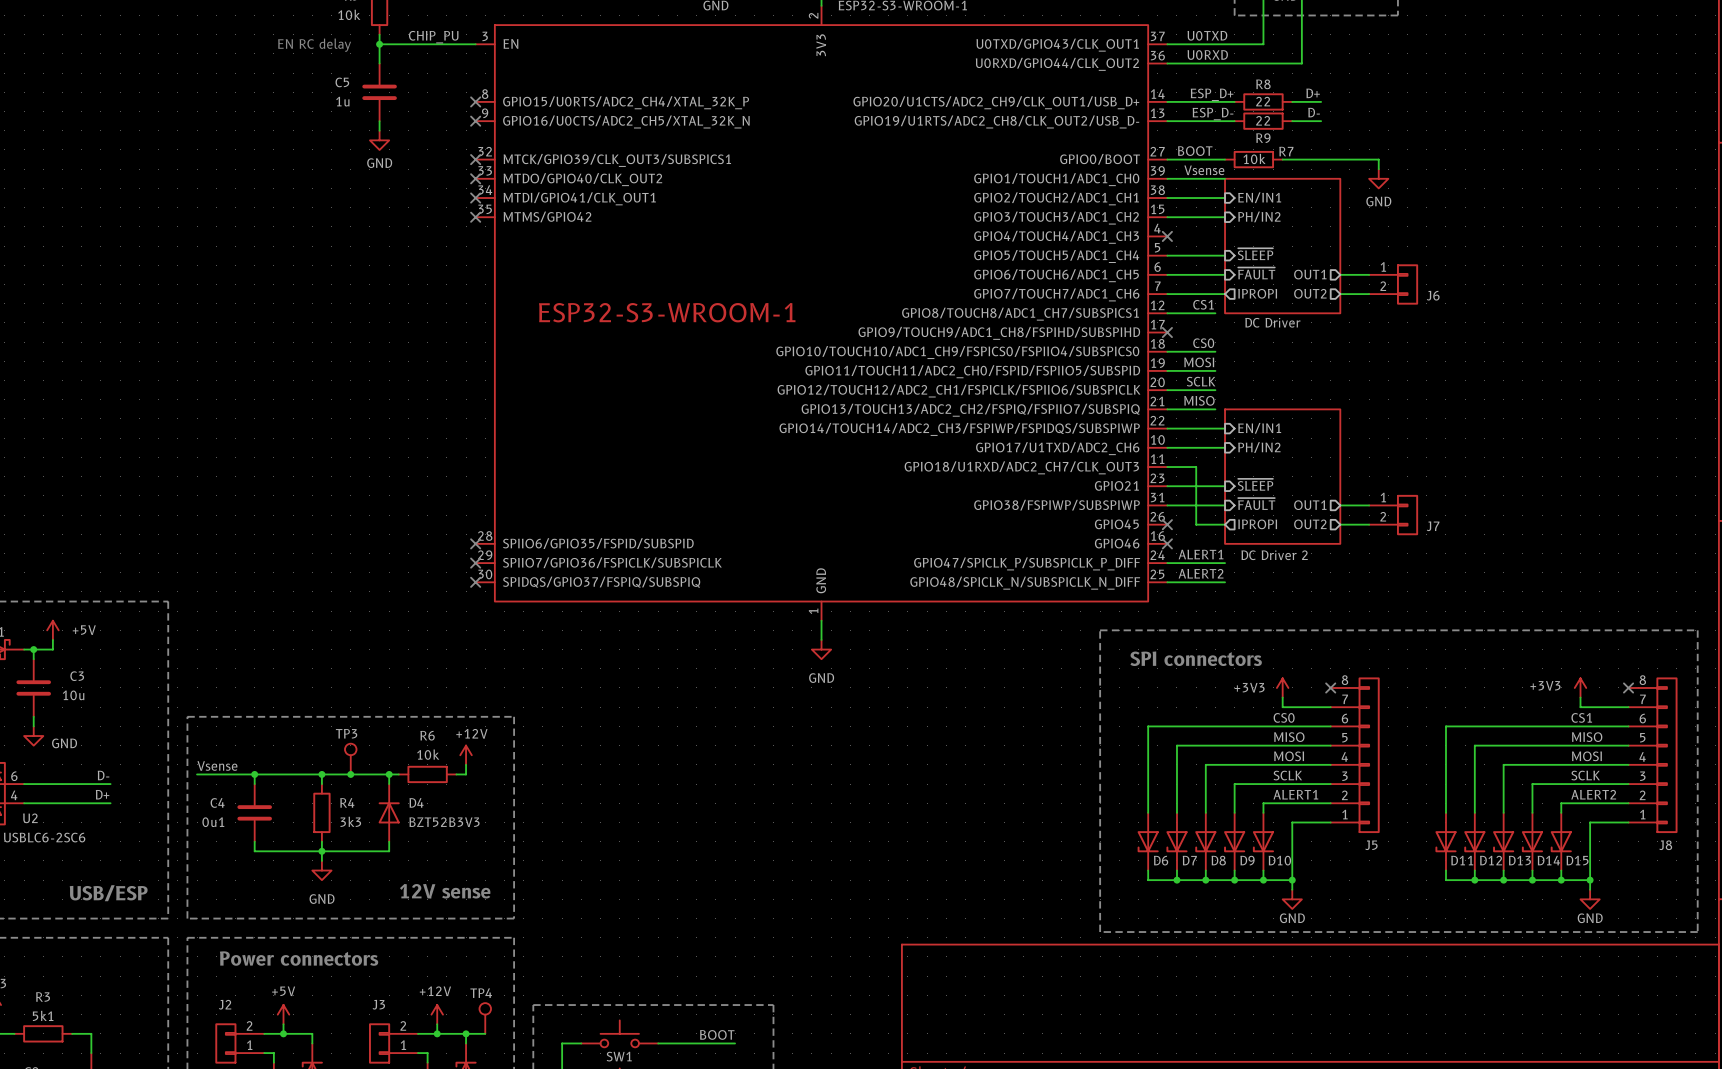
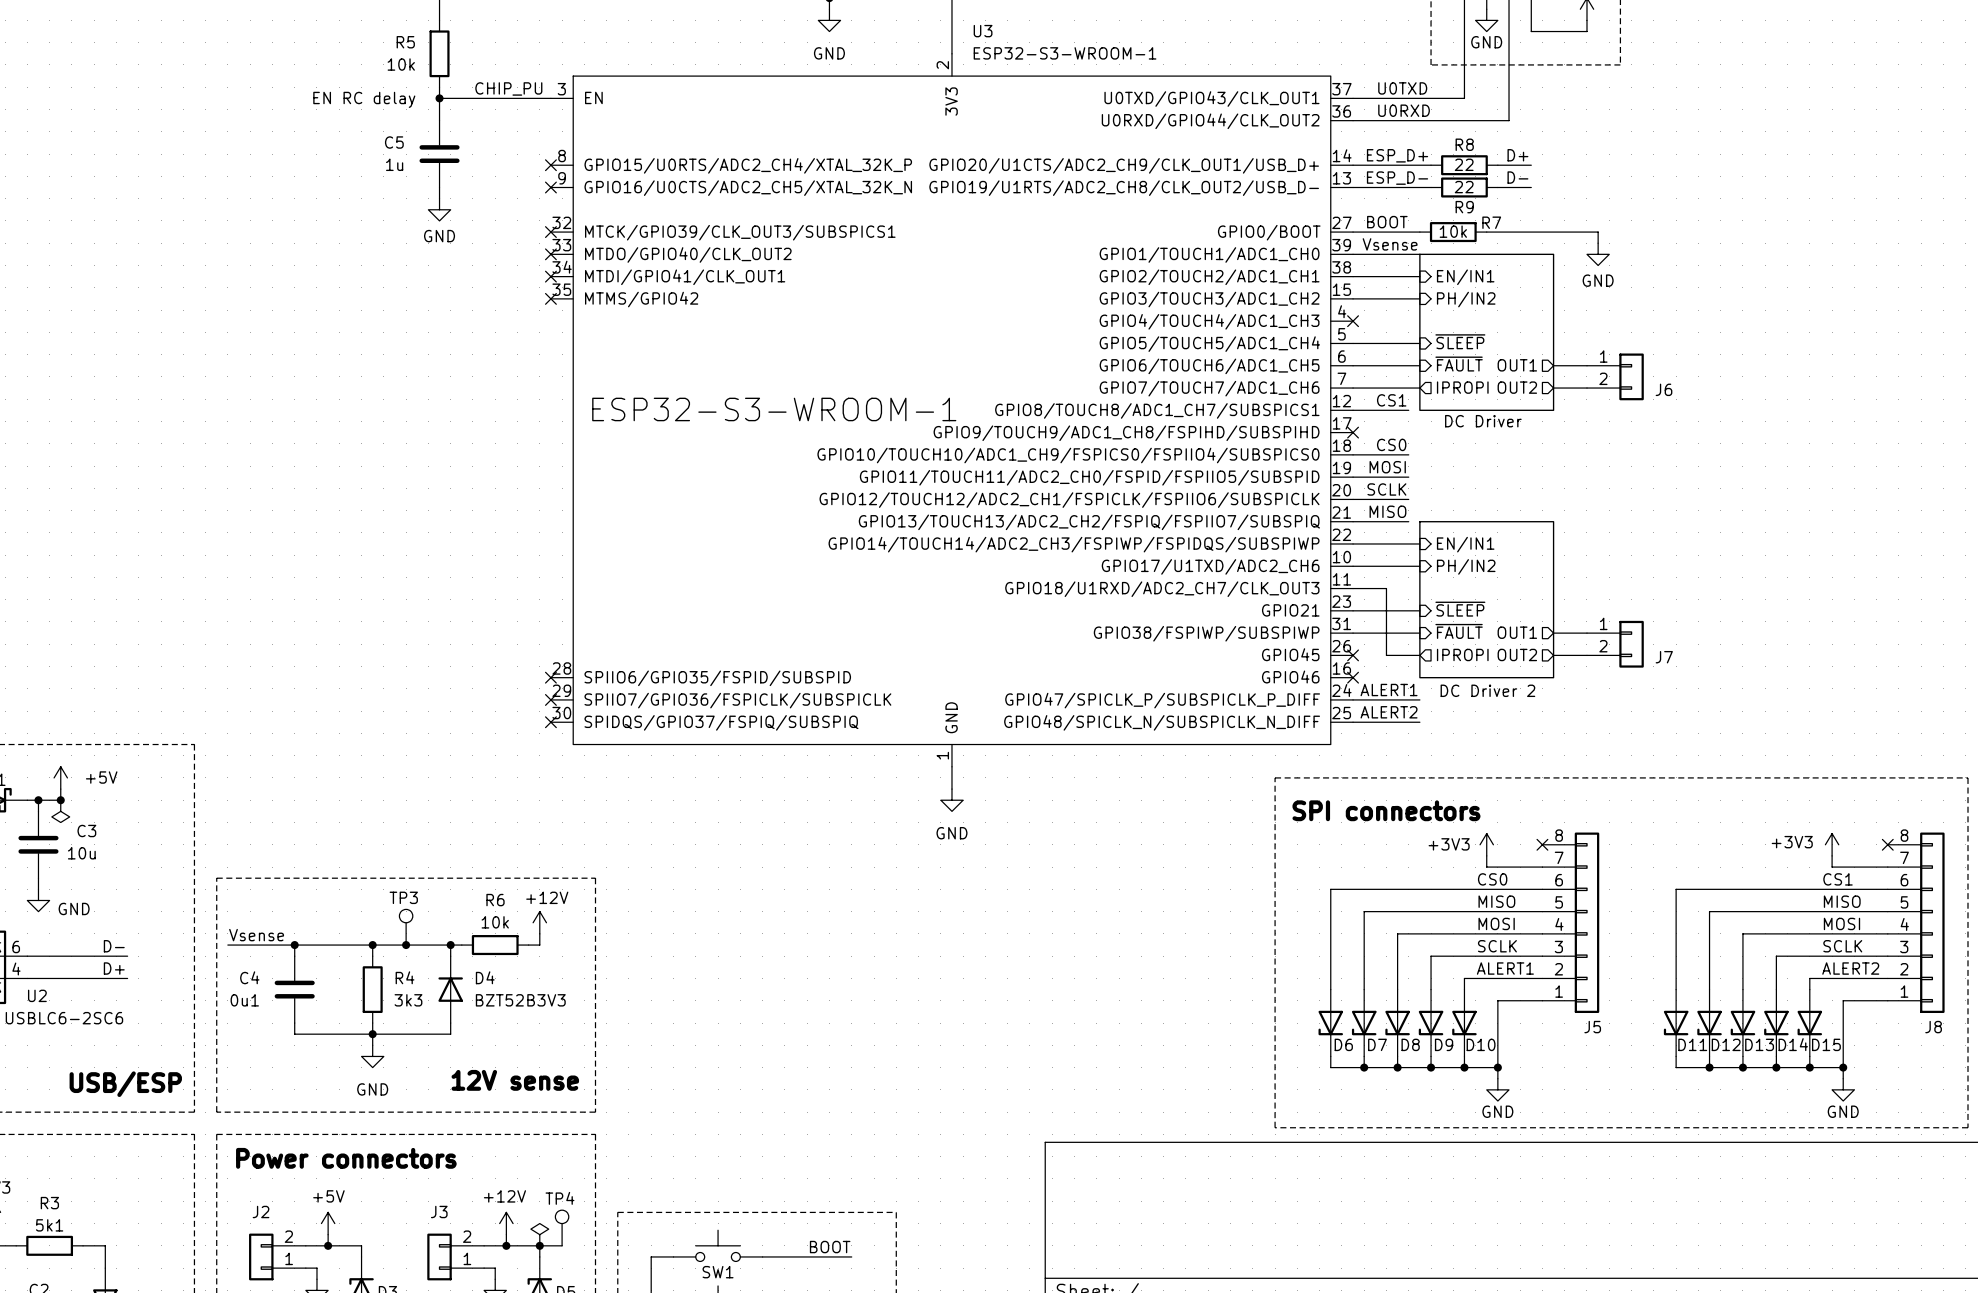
junction: none -> (60, 800)
power symbol: none -> (60, 811)
power symbol: none -> (539, 1234)

